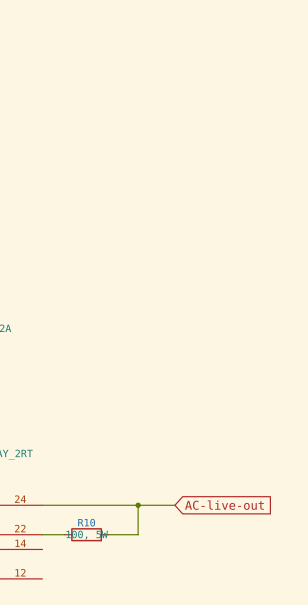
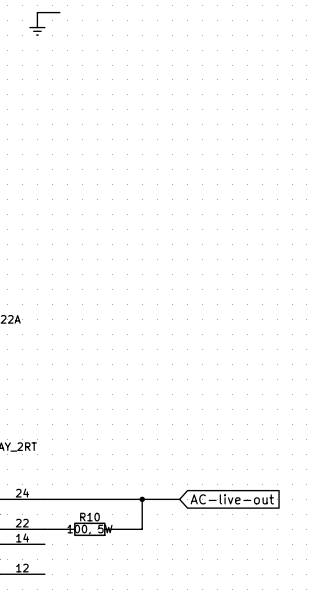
wire: none -> (59, 12) (37, 12) (37, 20)
power symbol: none -> (37, 27)

